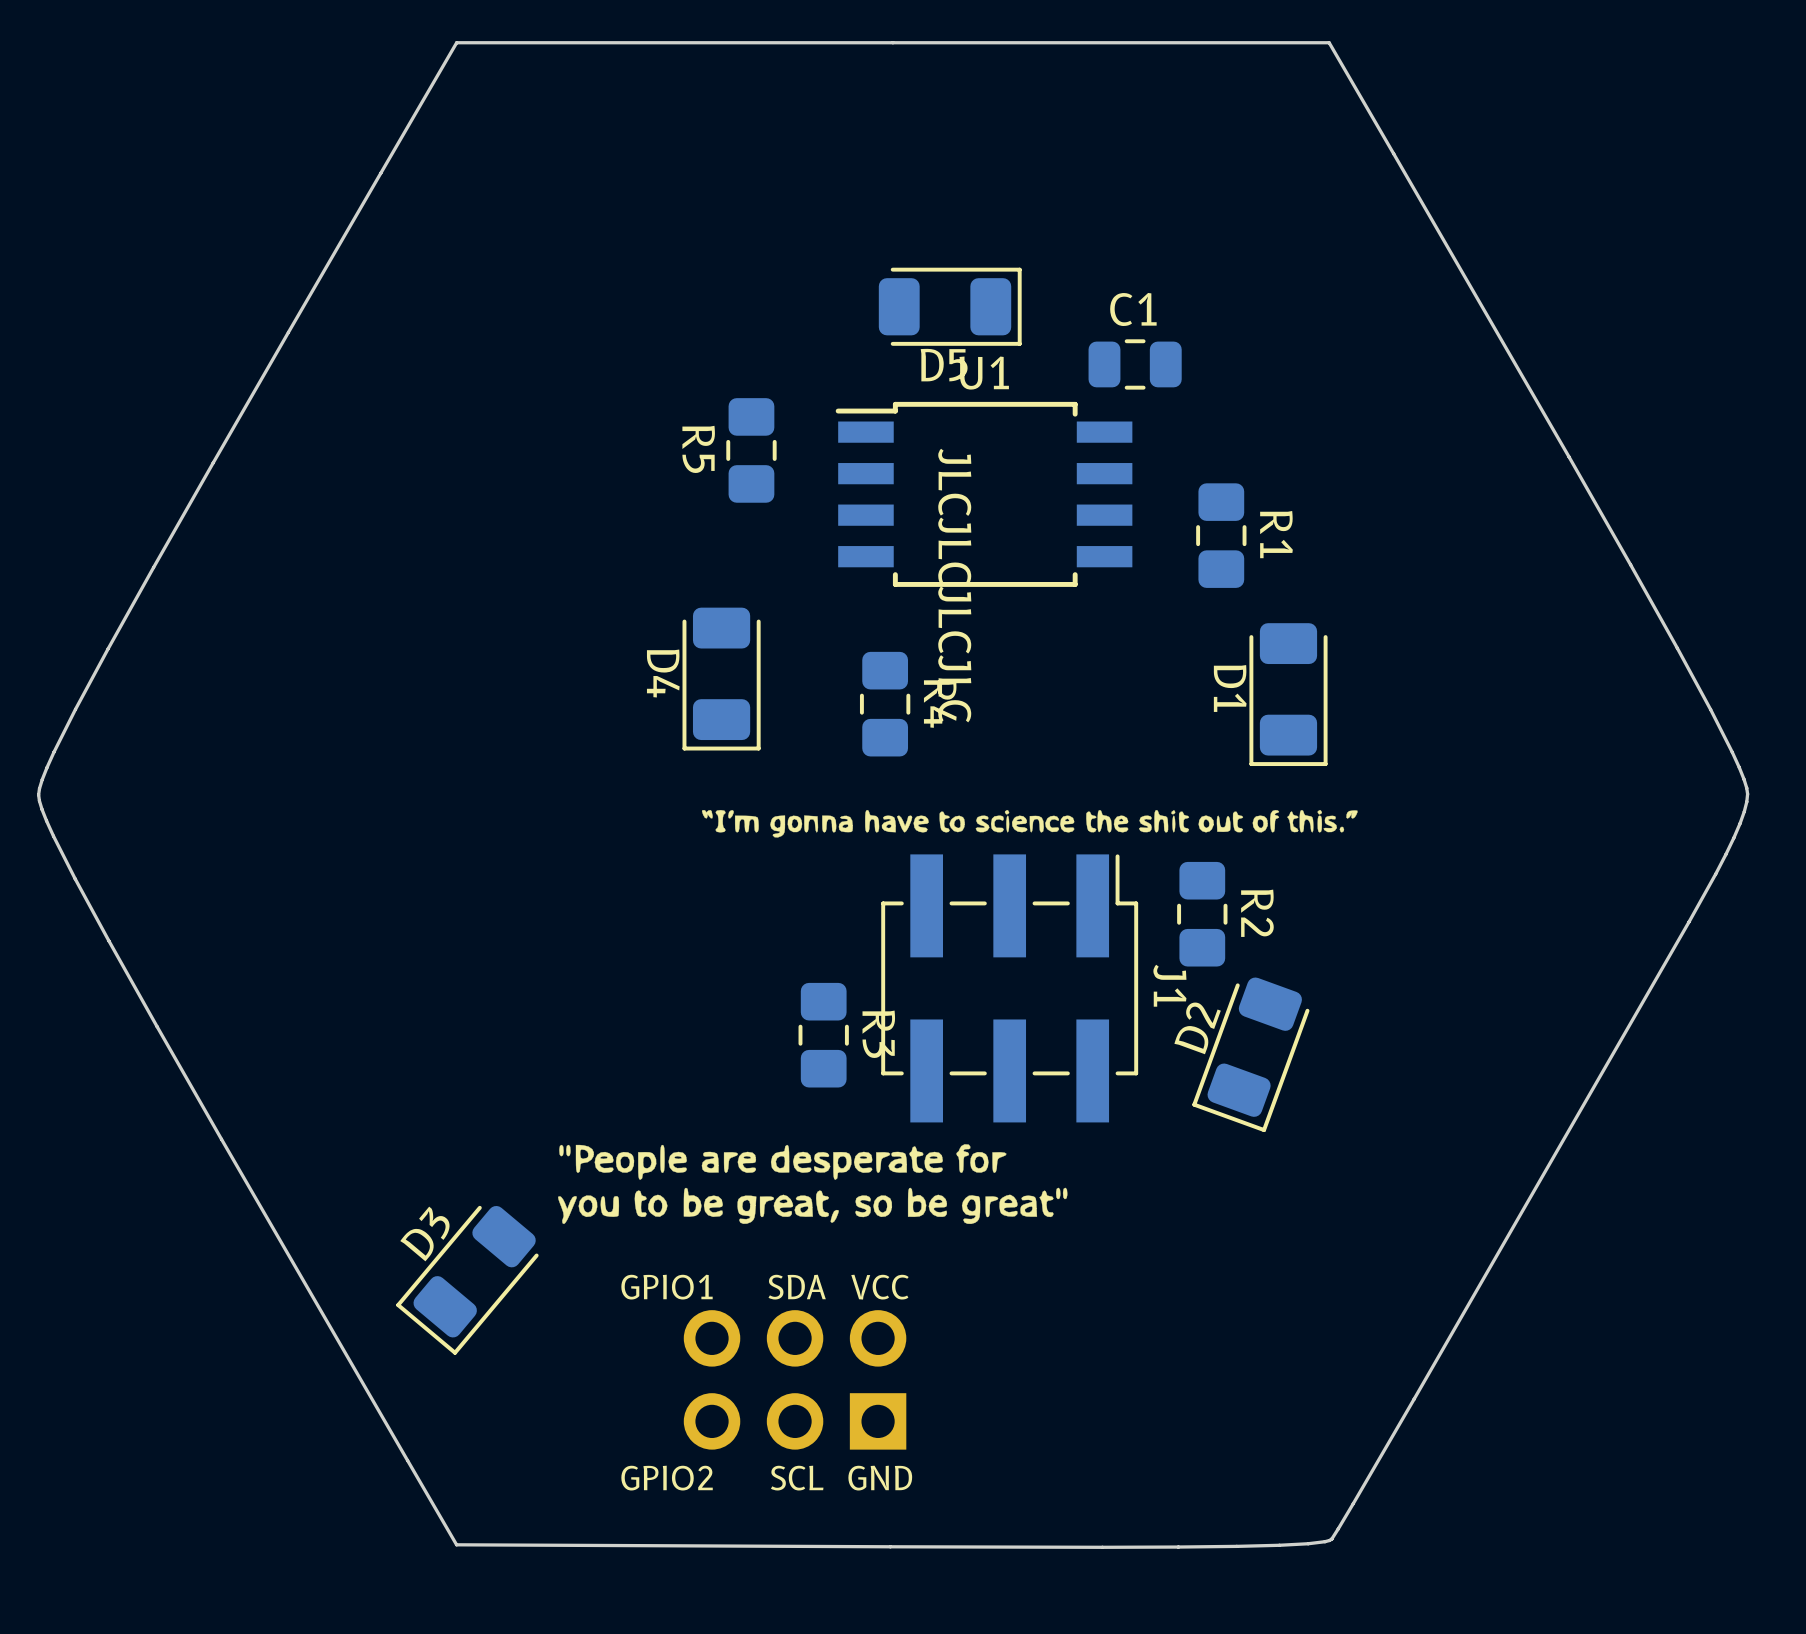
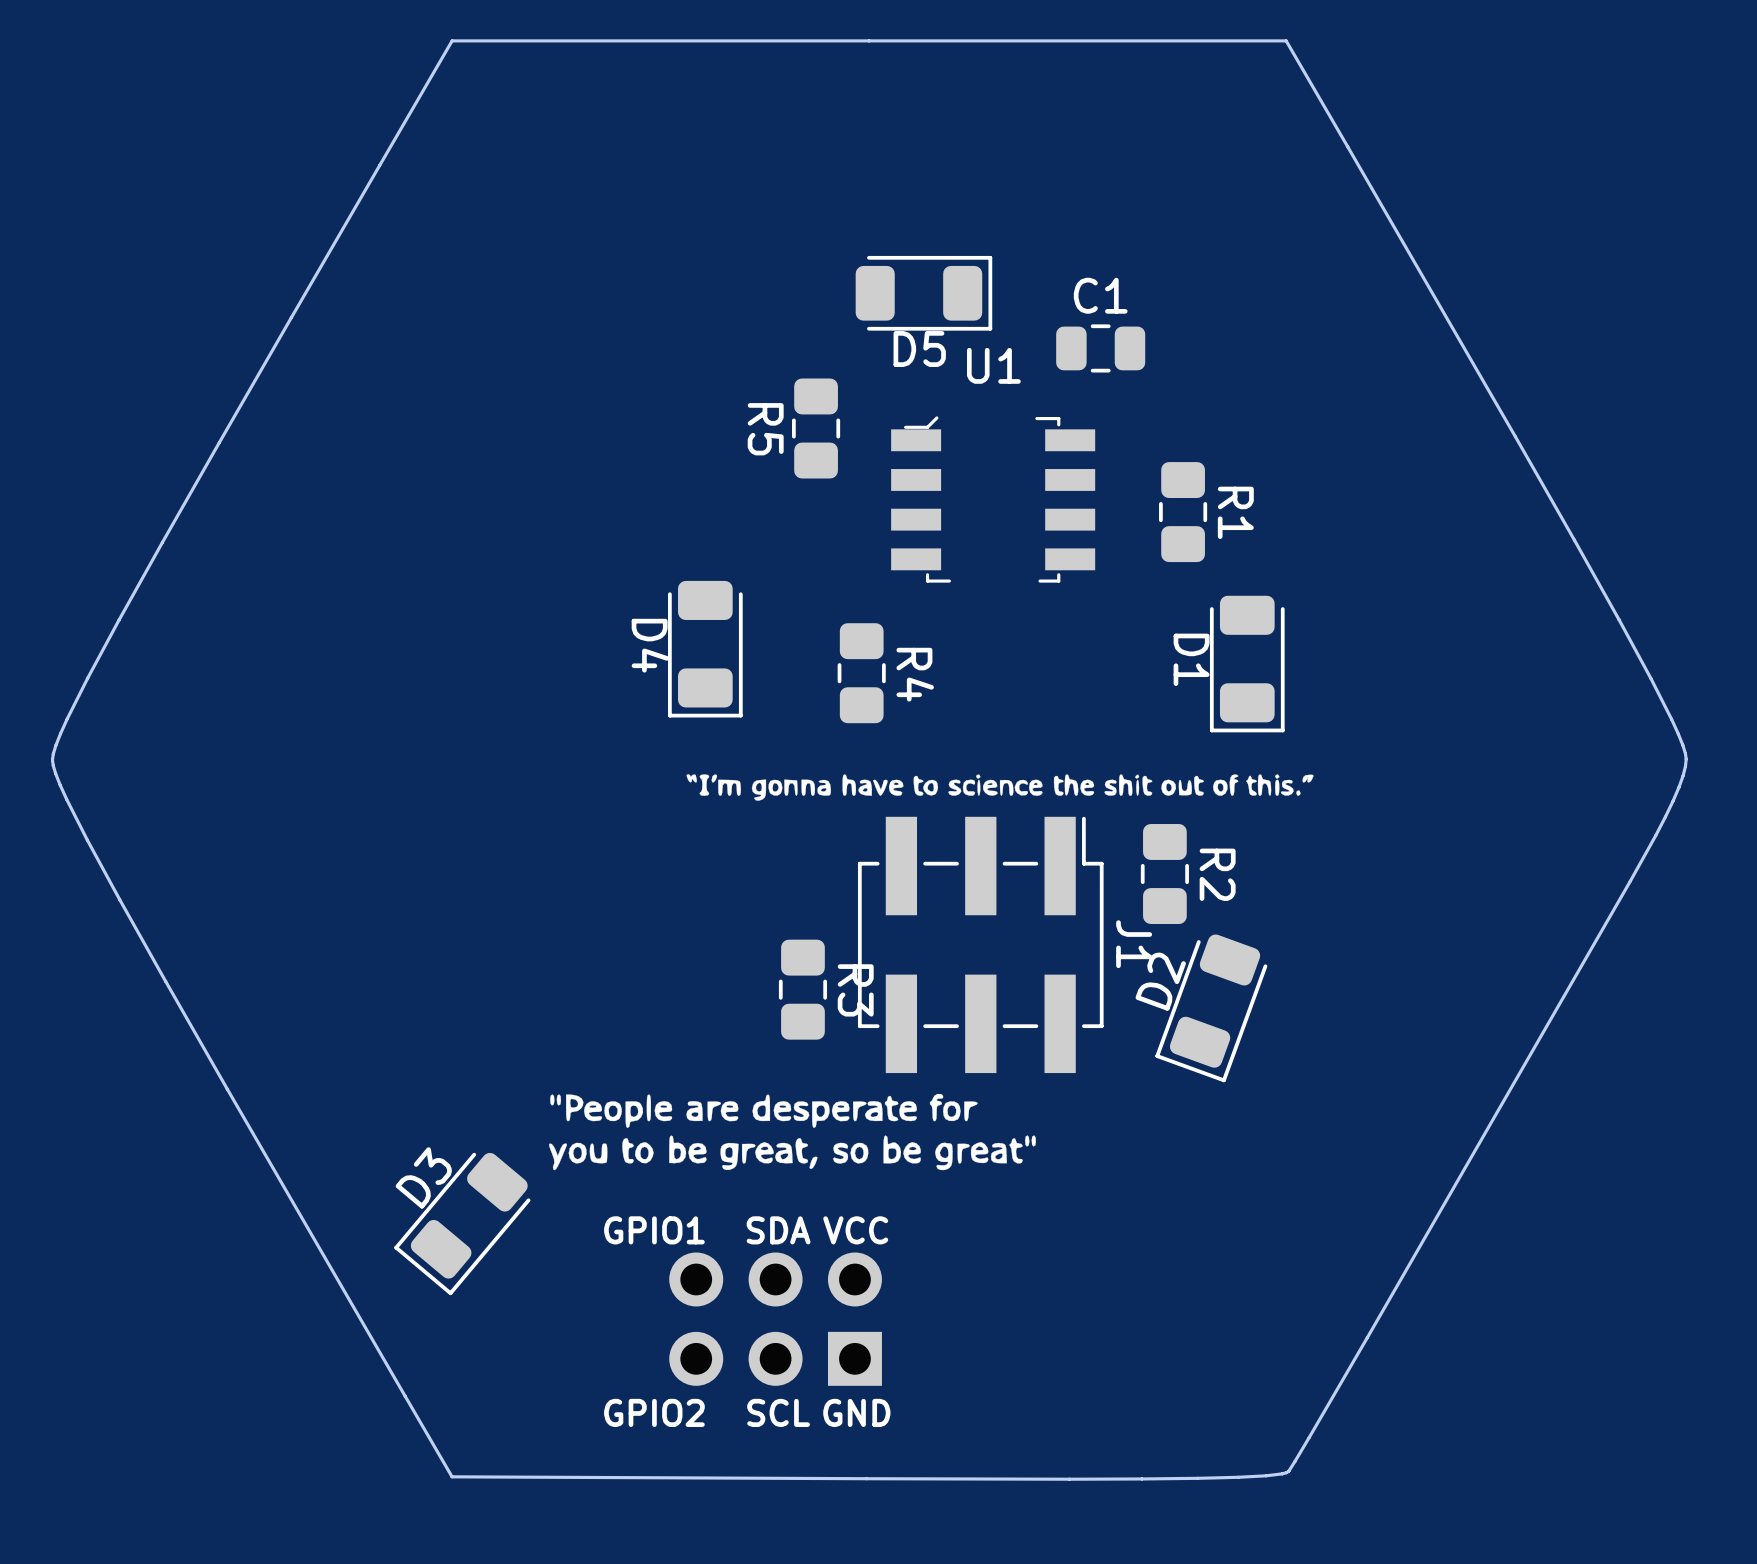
U1 footprint: [835, 401, 1133, 587] -> [891, 416, 1096, 583]
R5 position: (751, 450) -> (816, 428)
text: JLCJLCJLCJLC (954, 585) -> none

